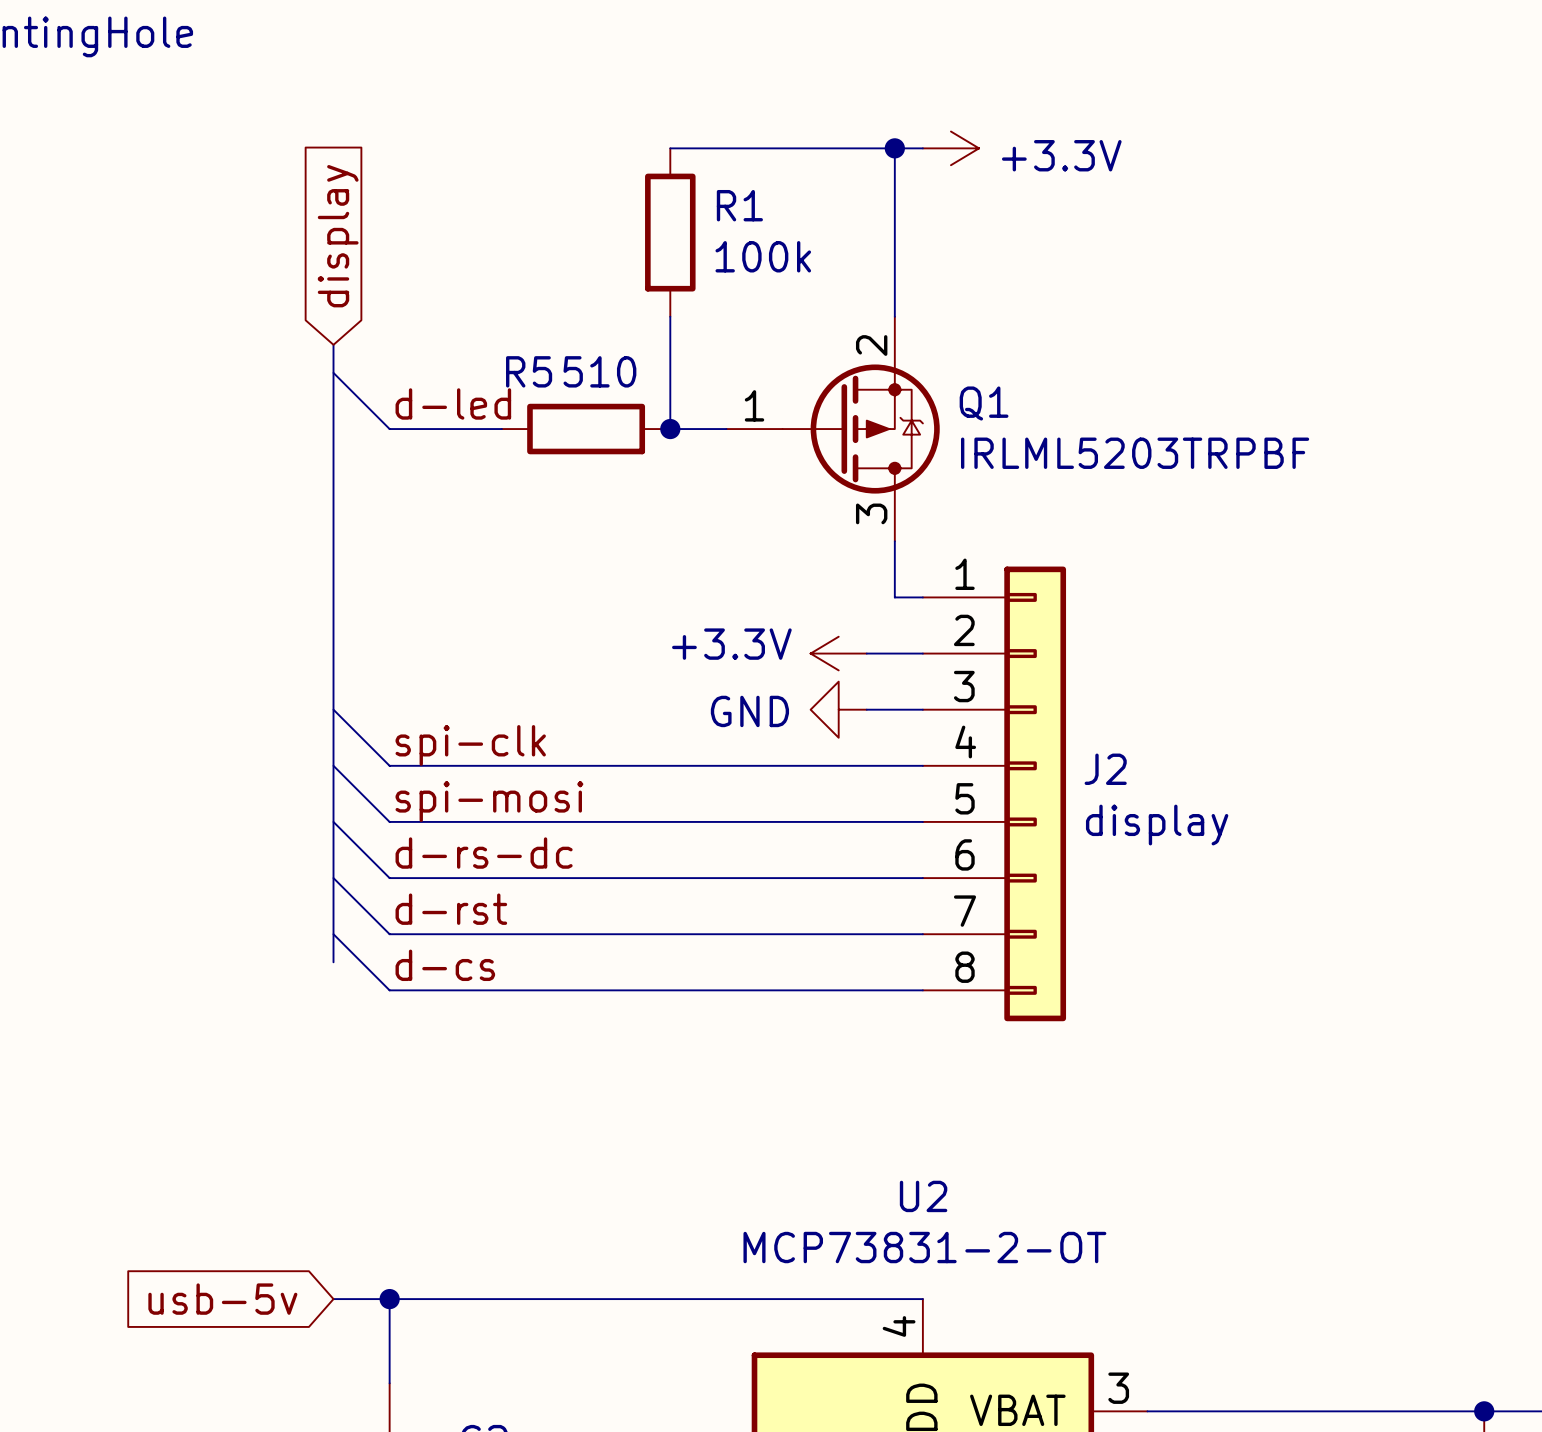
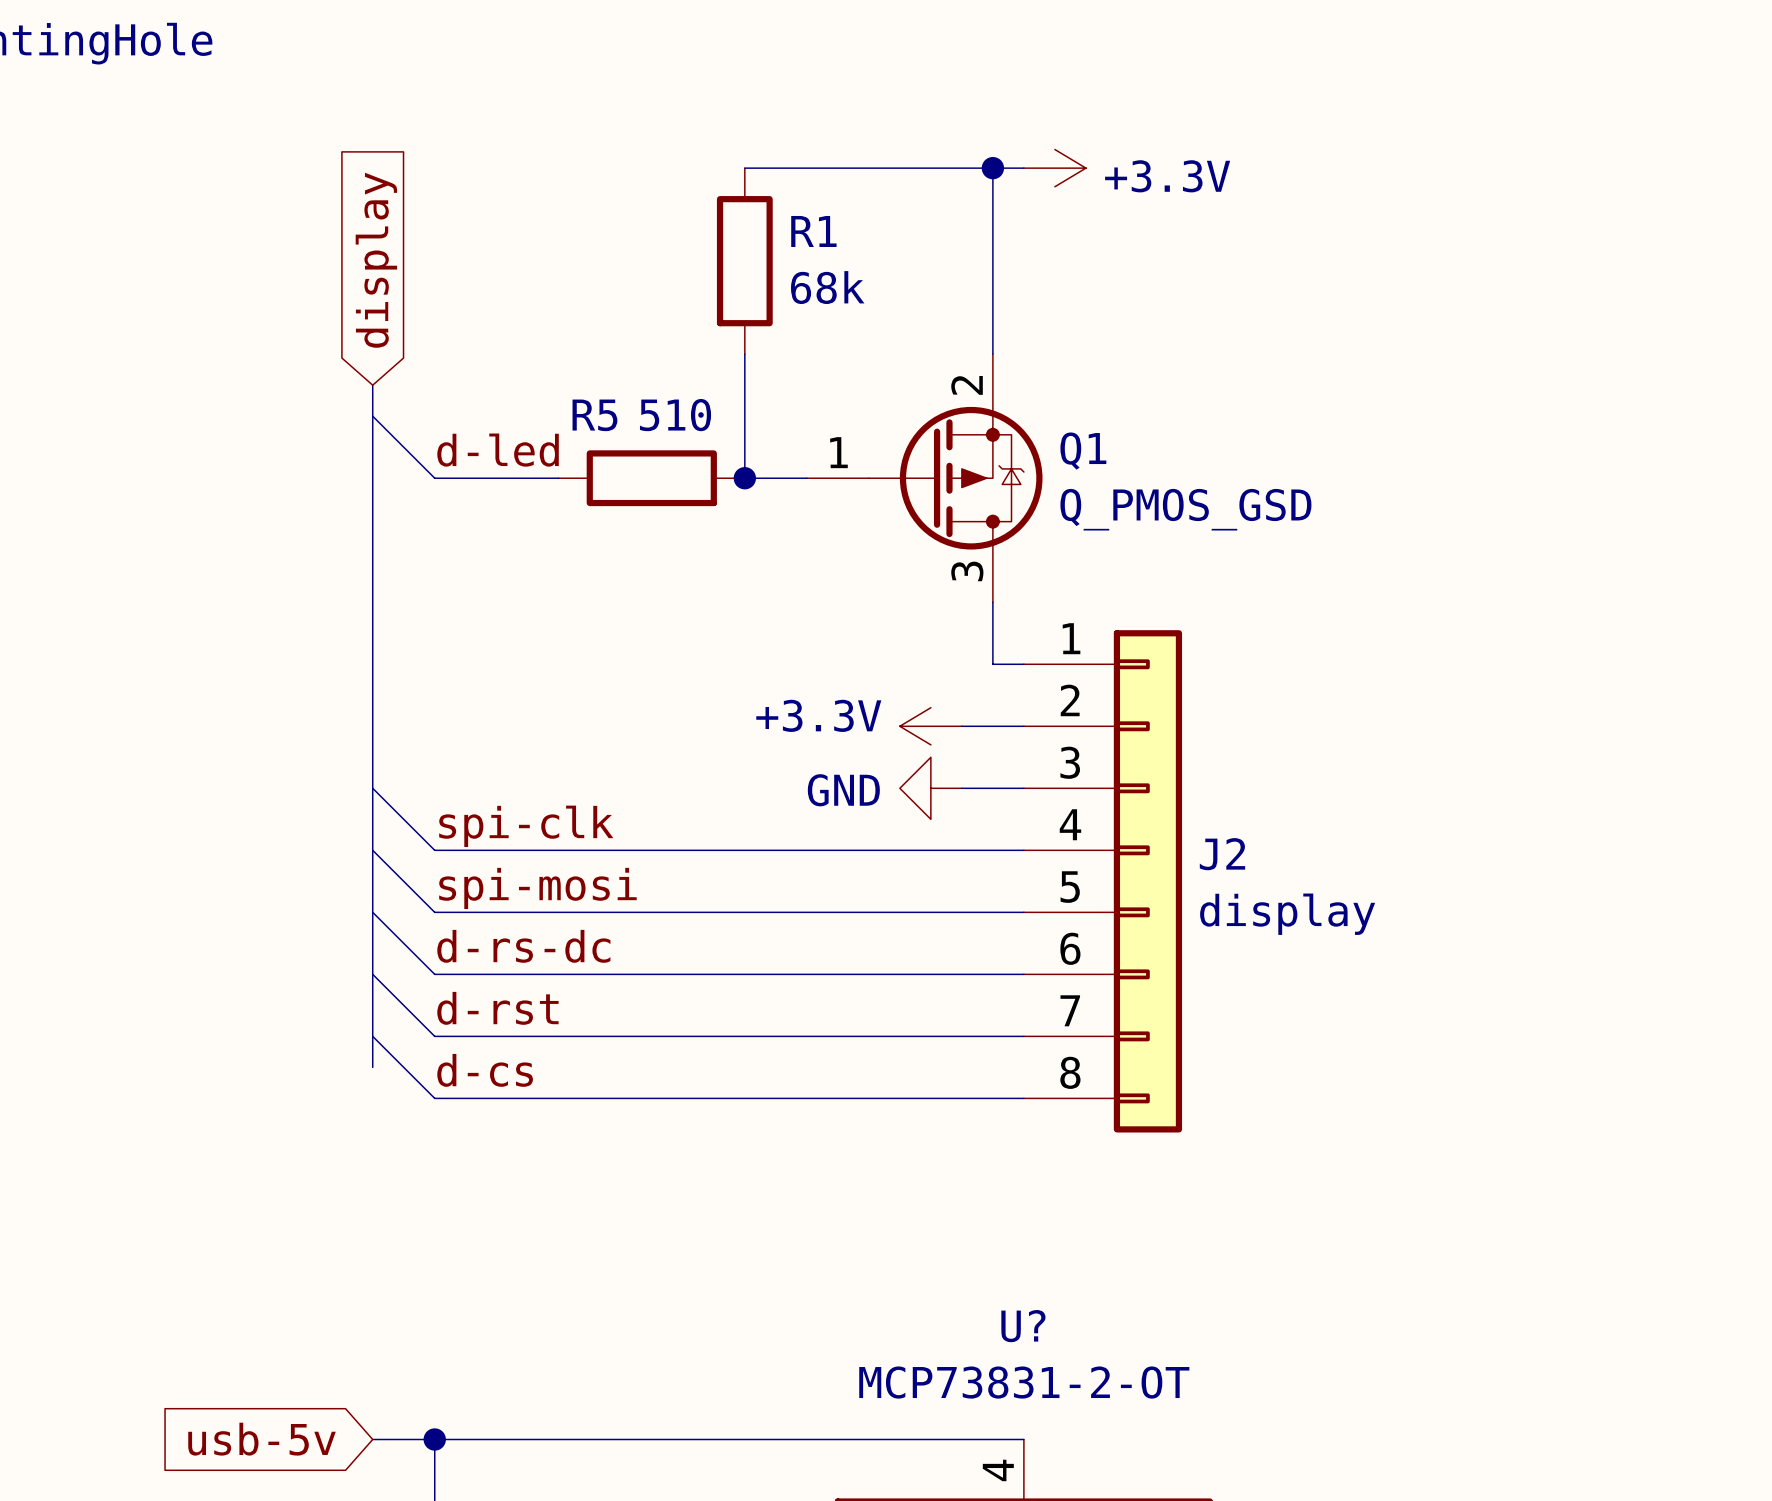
R1 value: 100k (763, 256) -> 68k (827, 287)
Q1 value: IRLML5203TRPBF (1135, 453) -> Q_PMOS_GSD (1185, 509)
U2 name: U2 (923, 1196) -> U? (1023, 1326)

